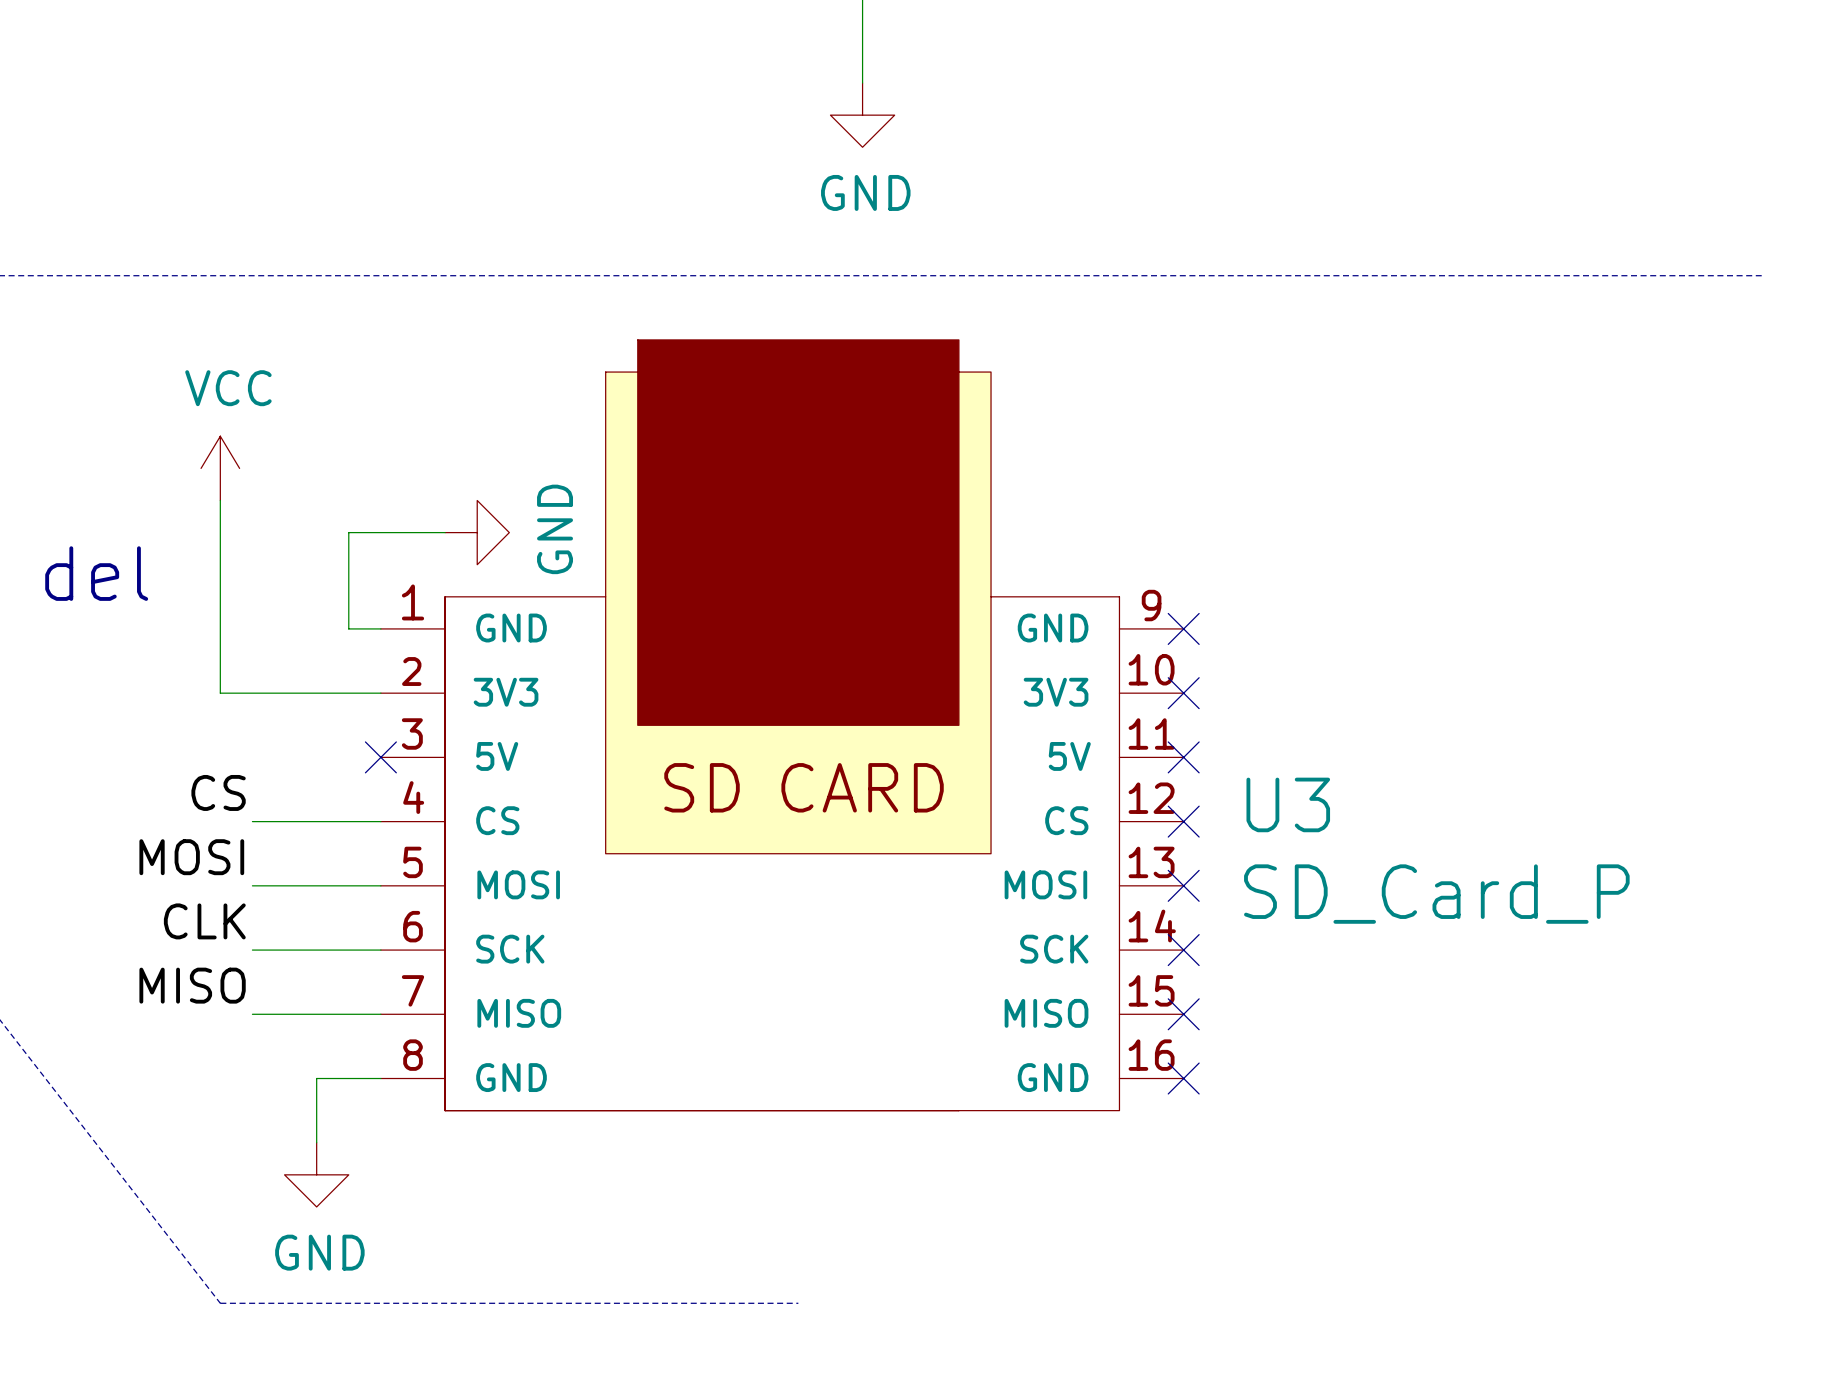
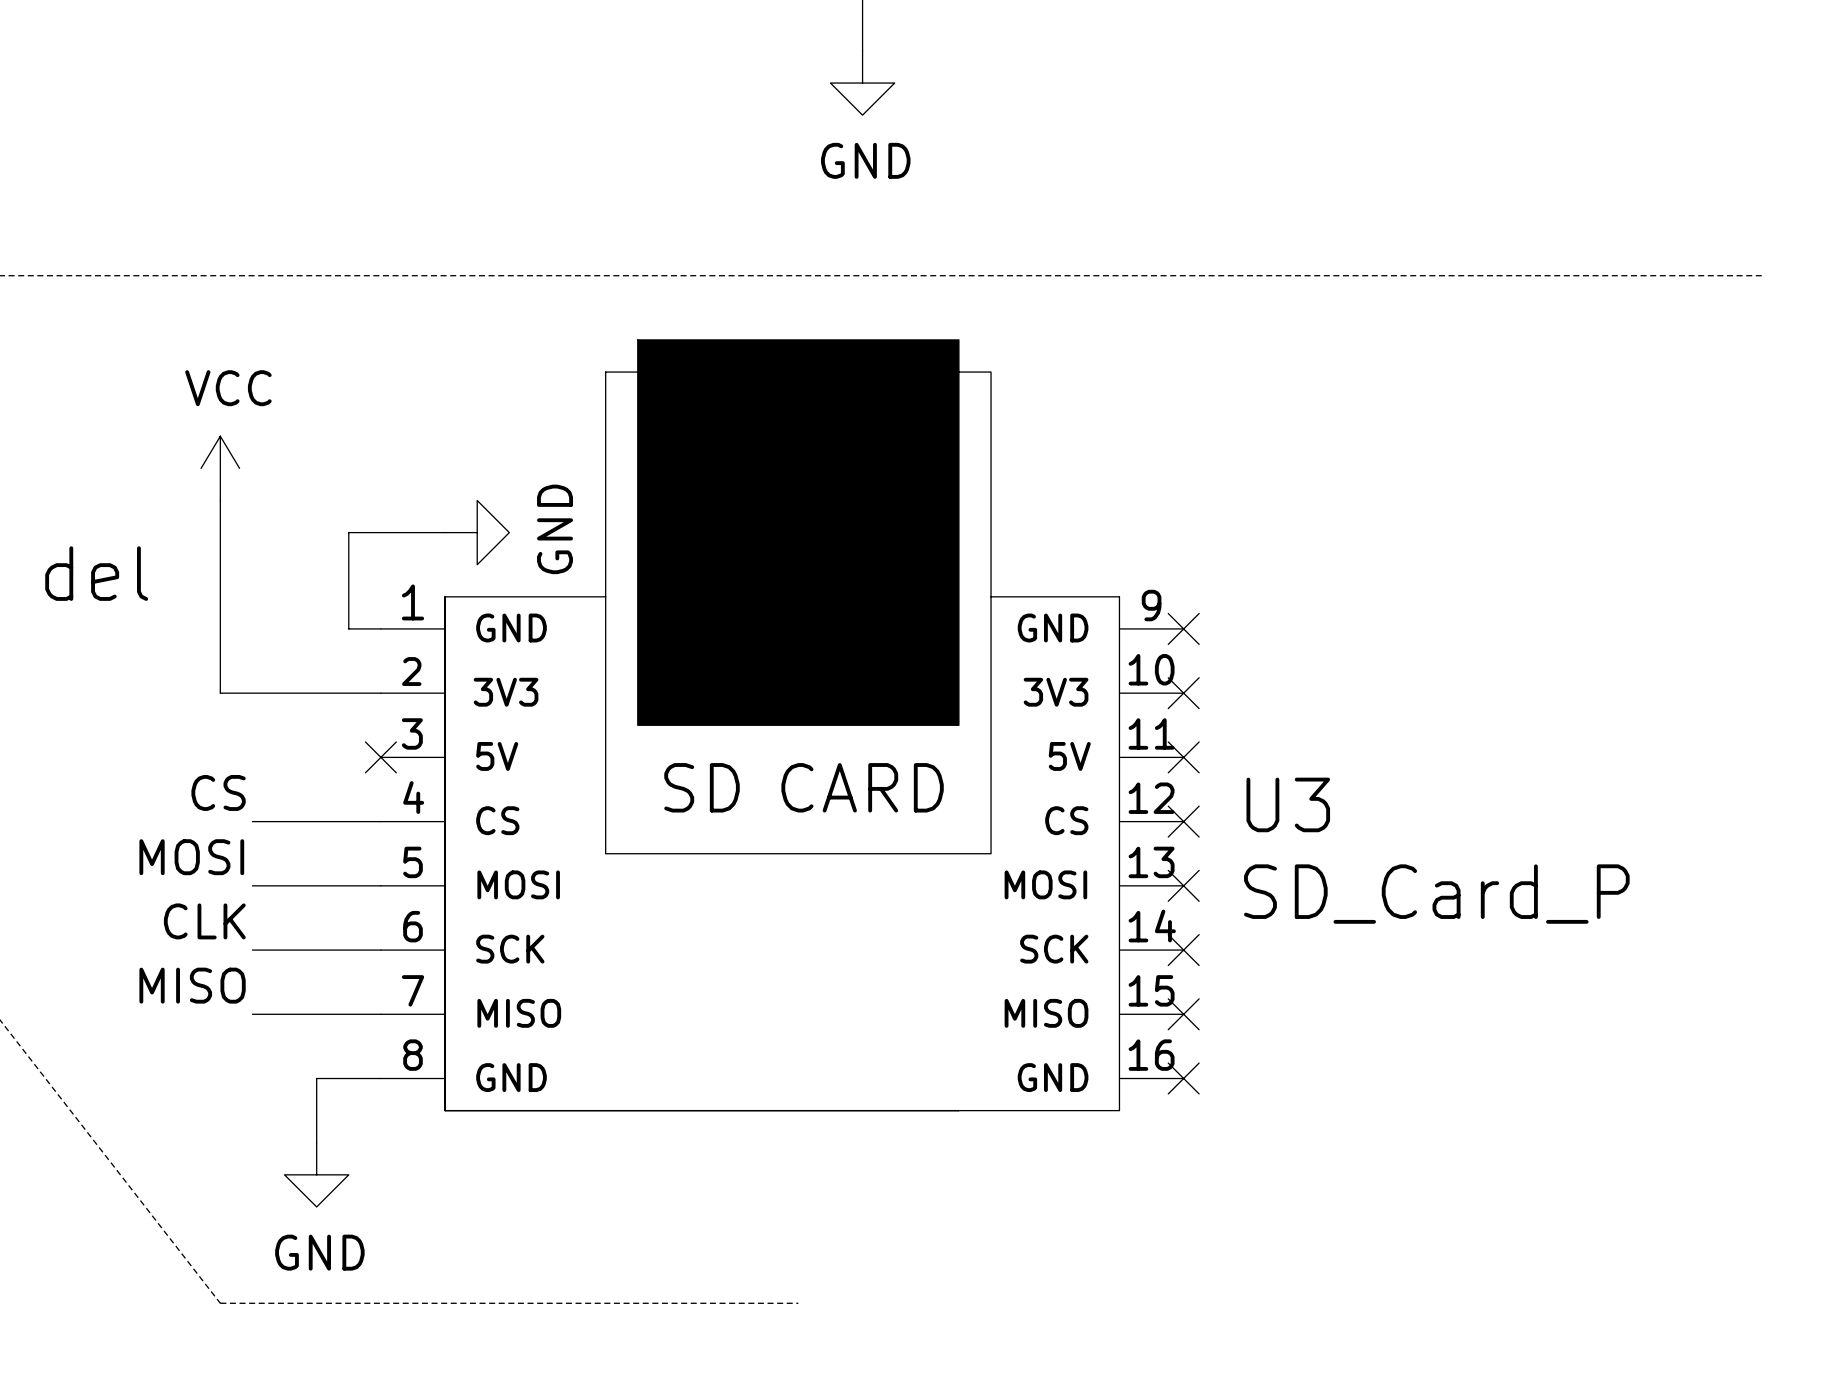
power symbol position: GND (862, 115) -> GND (862, 83)

